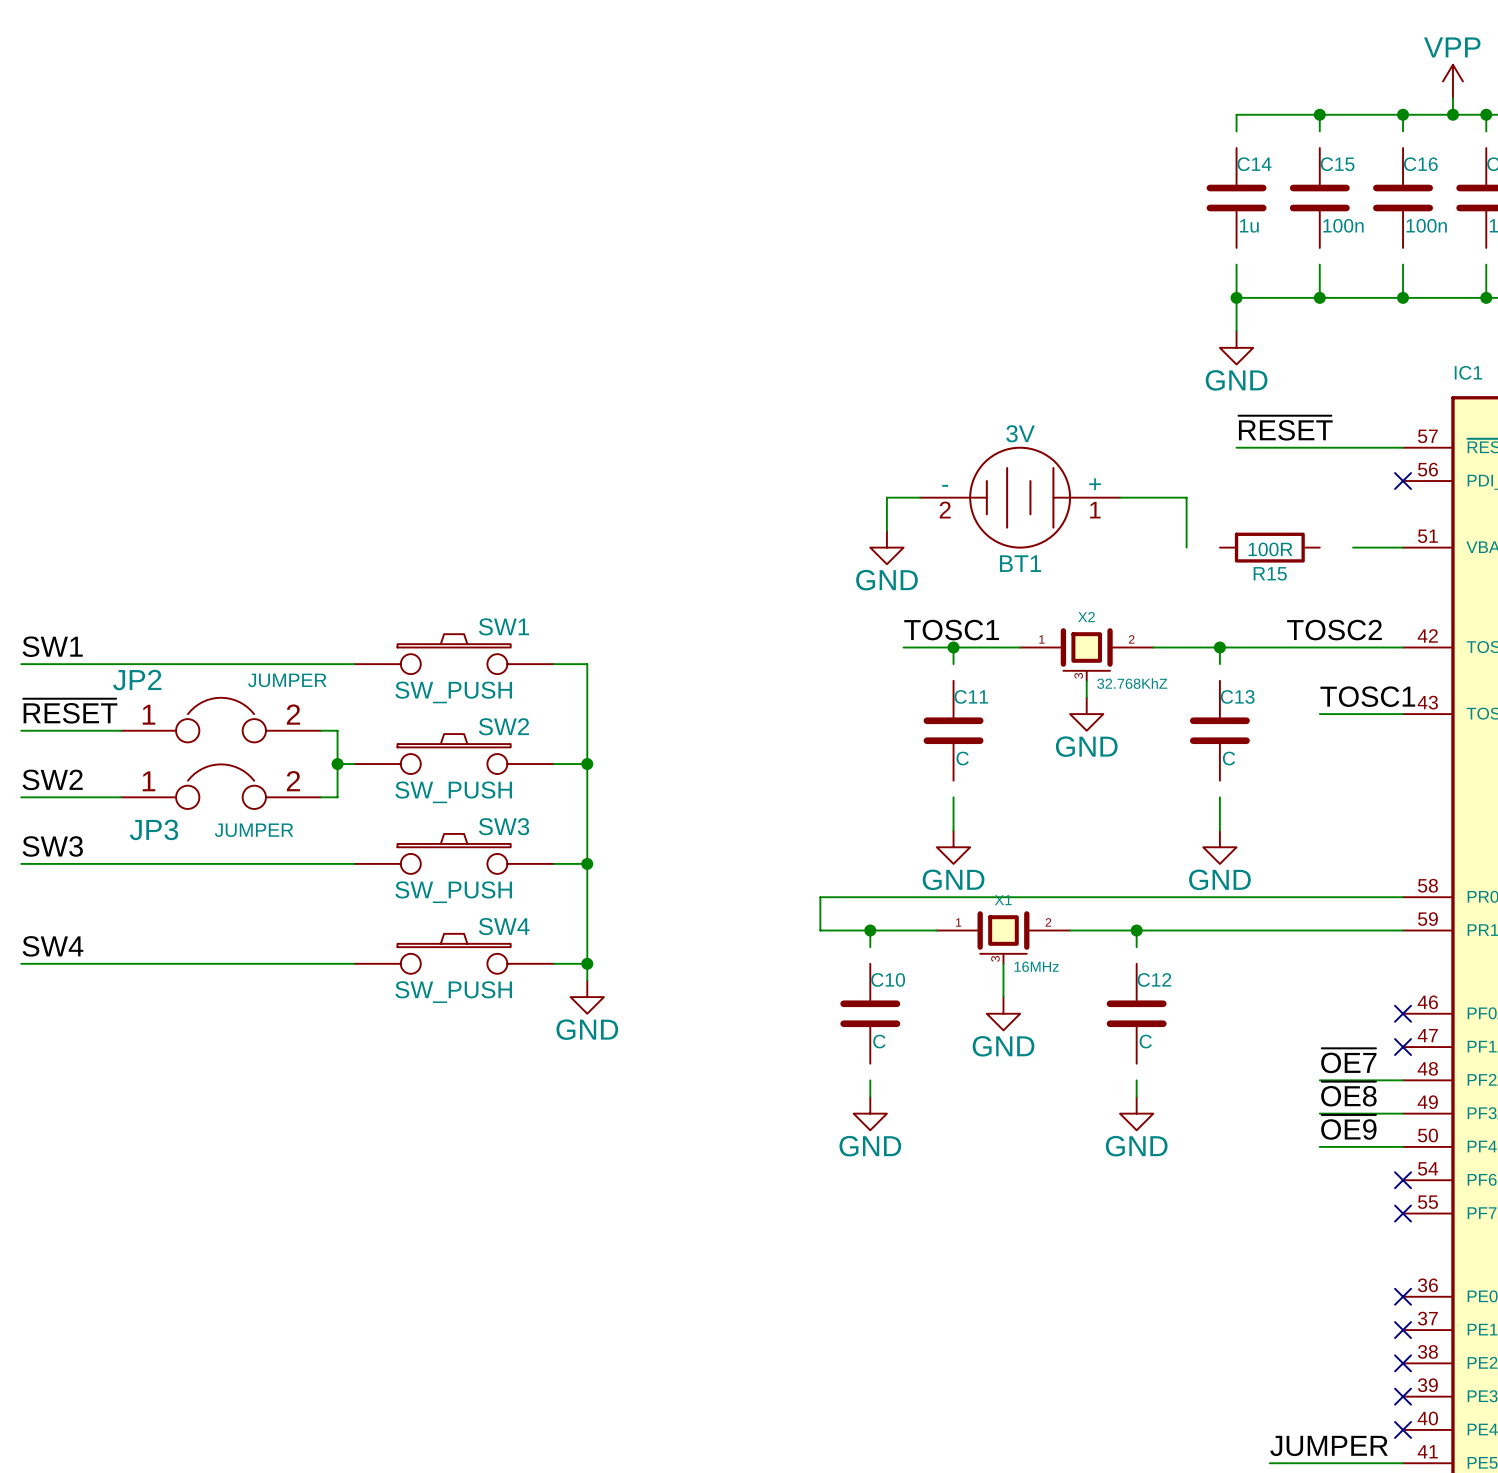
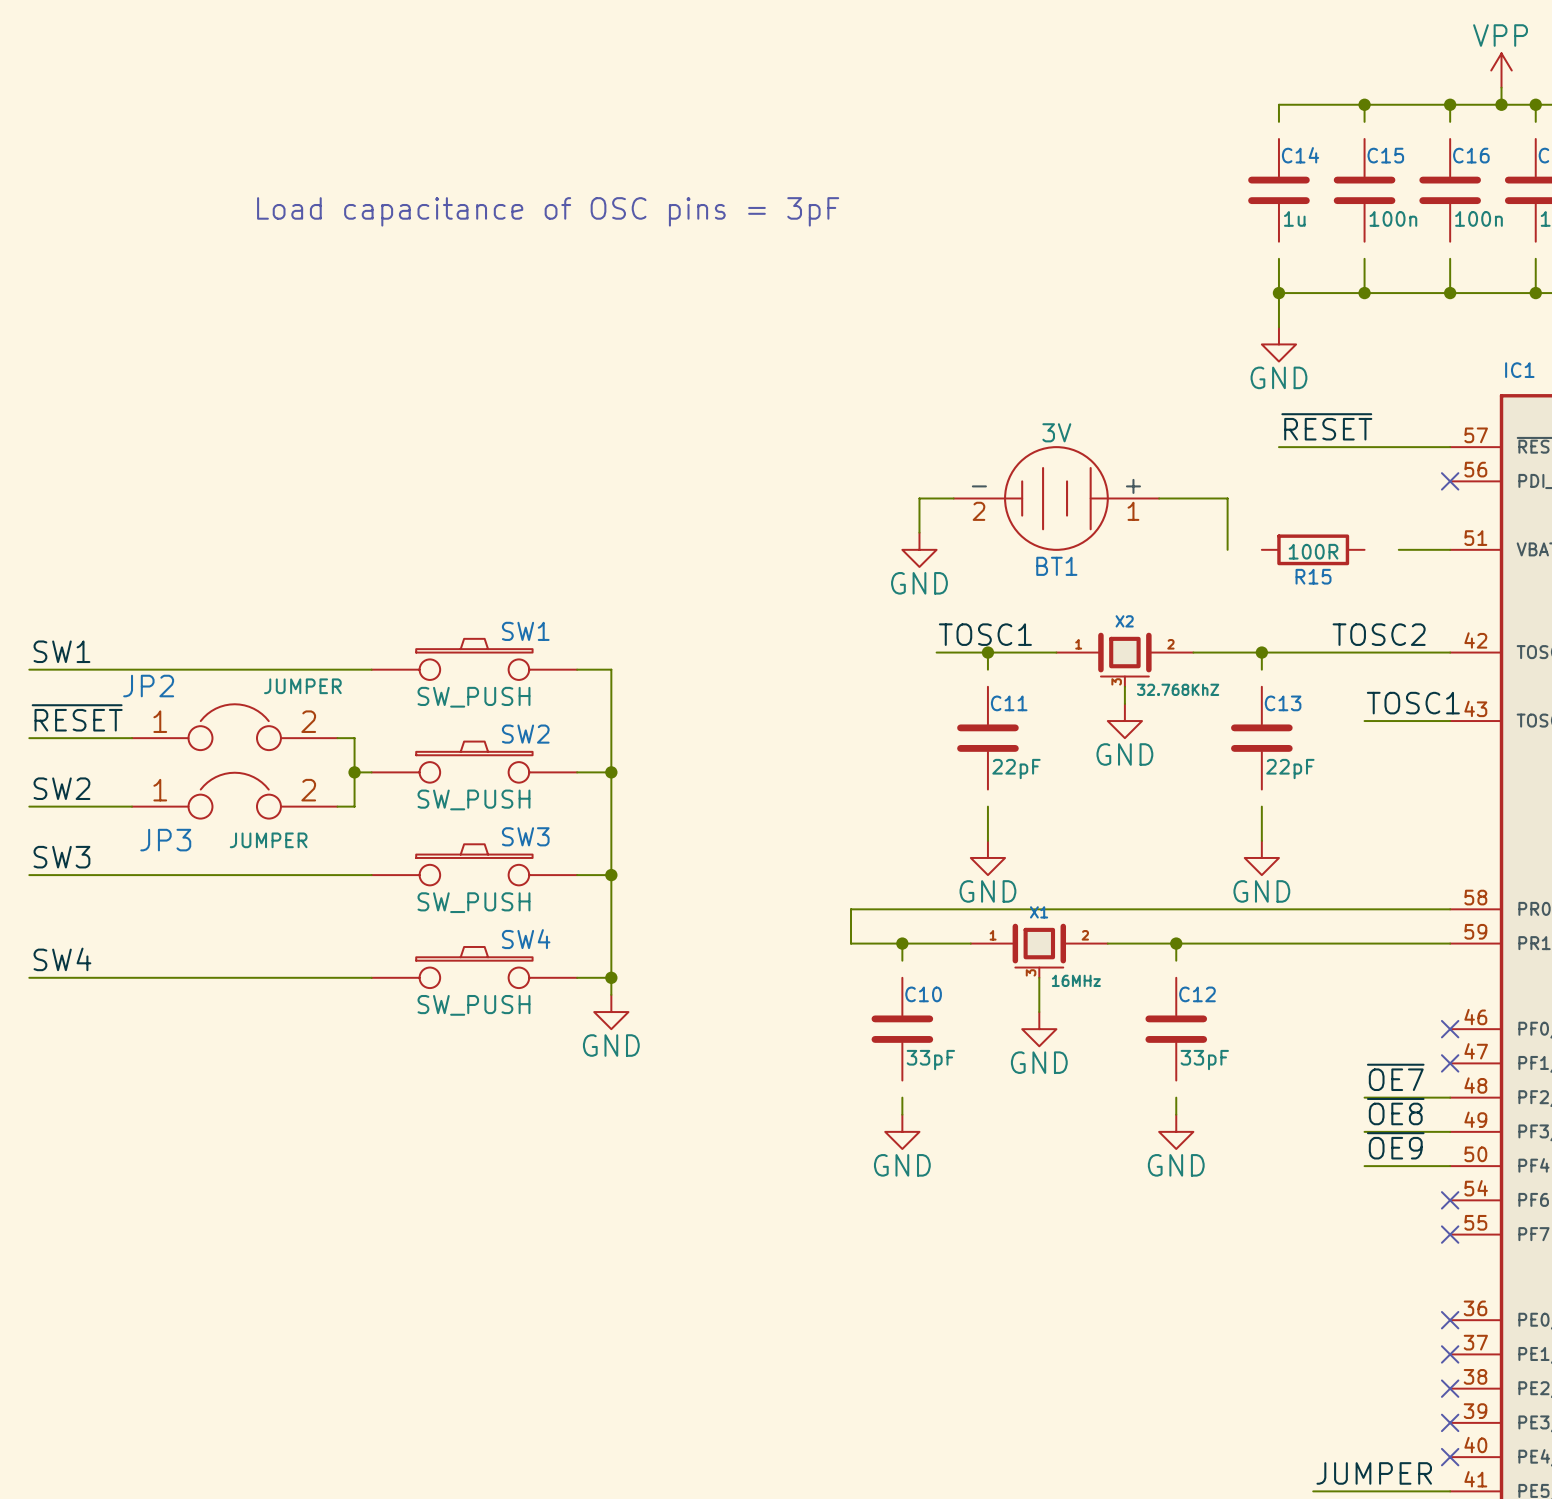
text: none -> Load capacitance of OSC pins = 3pF (548, 211)
C11 value: C (962, 758) -> 22pF (1016, 769)
C13 value: C (1229, 758) -> 22pF (1290, 769)
C10 value: C (879, 1041) -> 33pF (930, 1060)
C12 value: C (1145, 1041) -> 33pF (1204, 1060)

